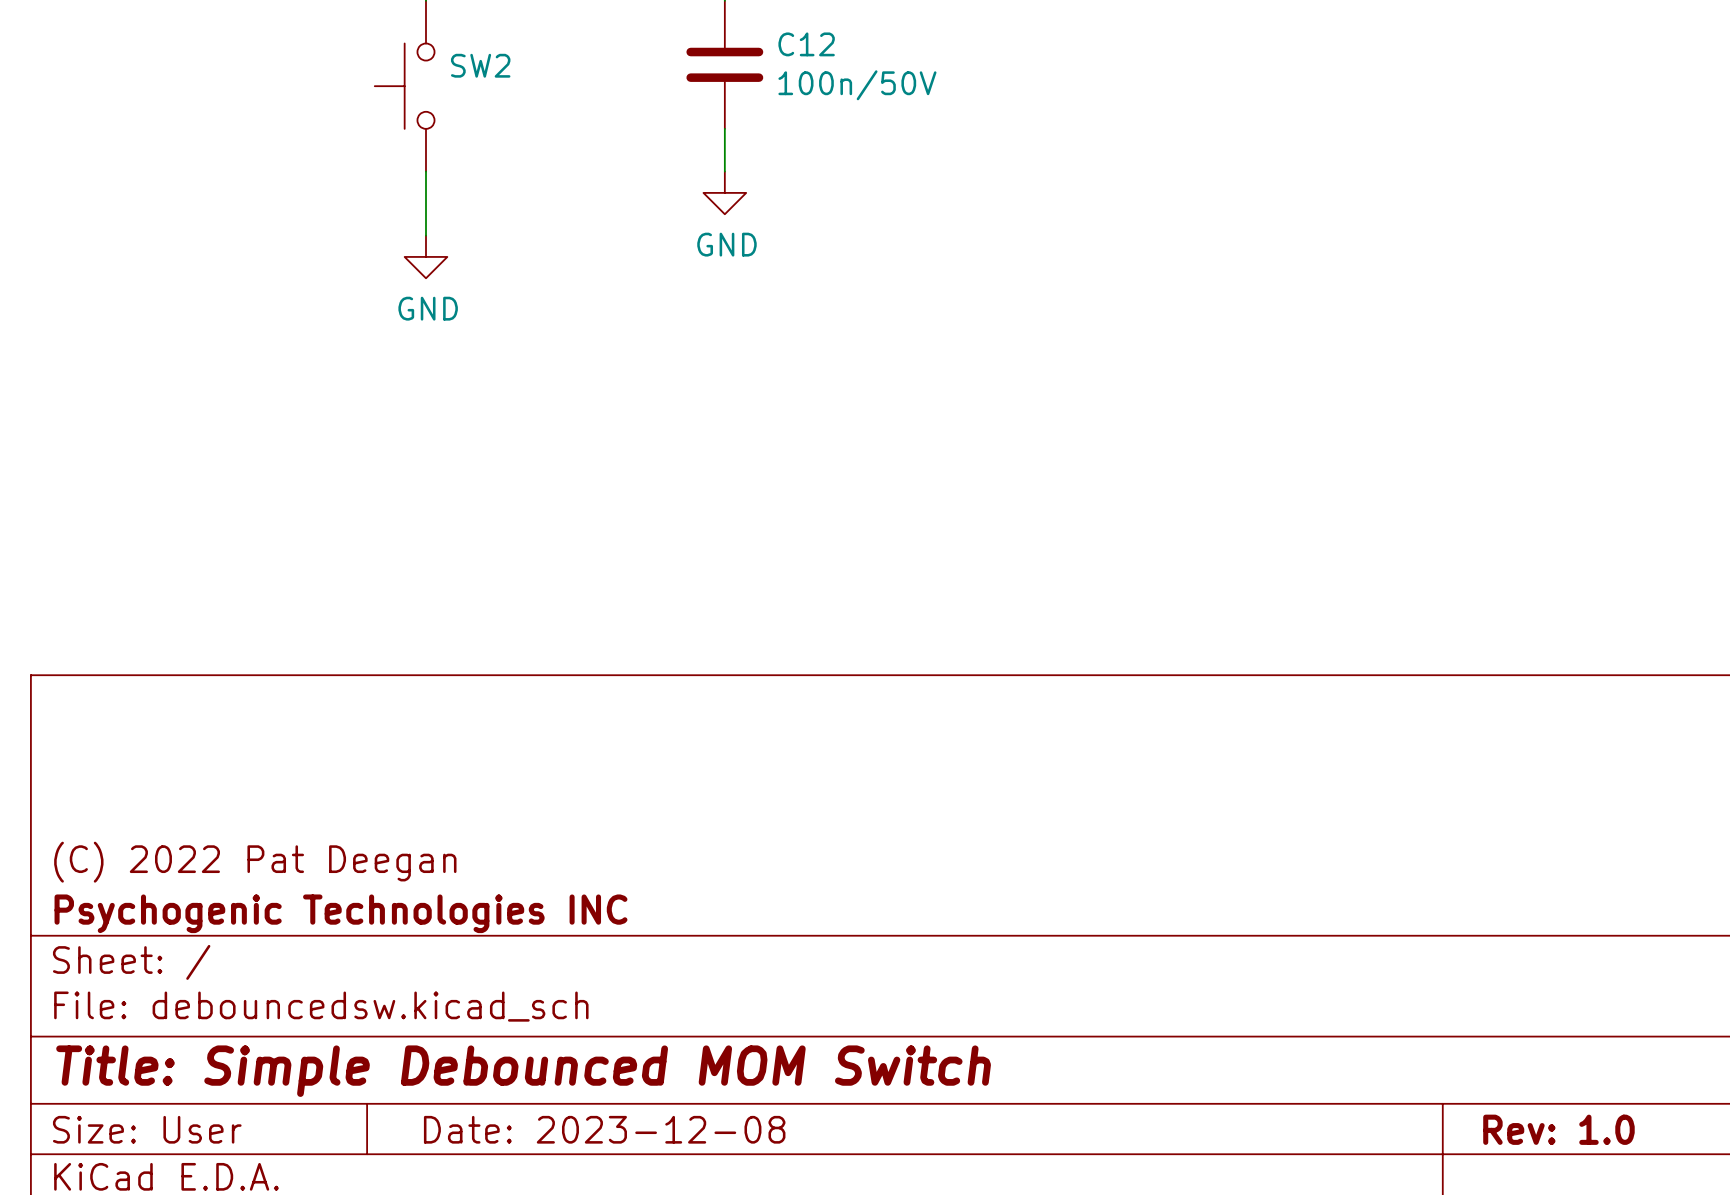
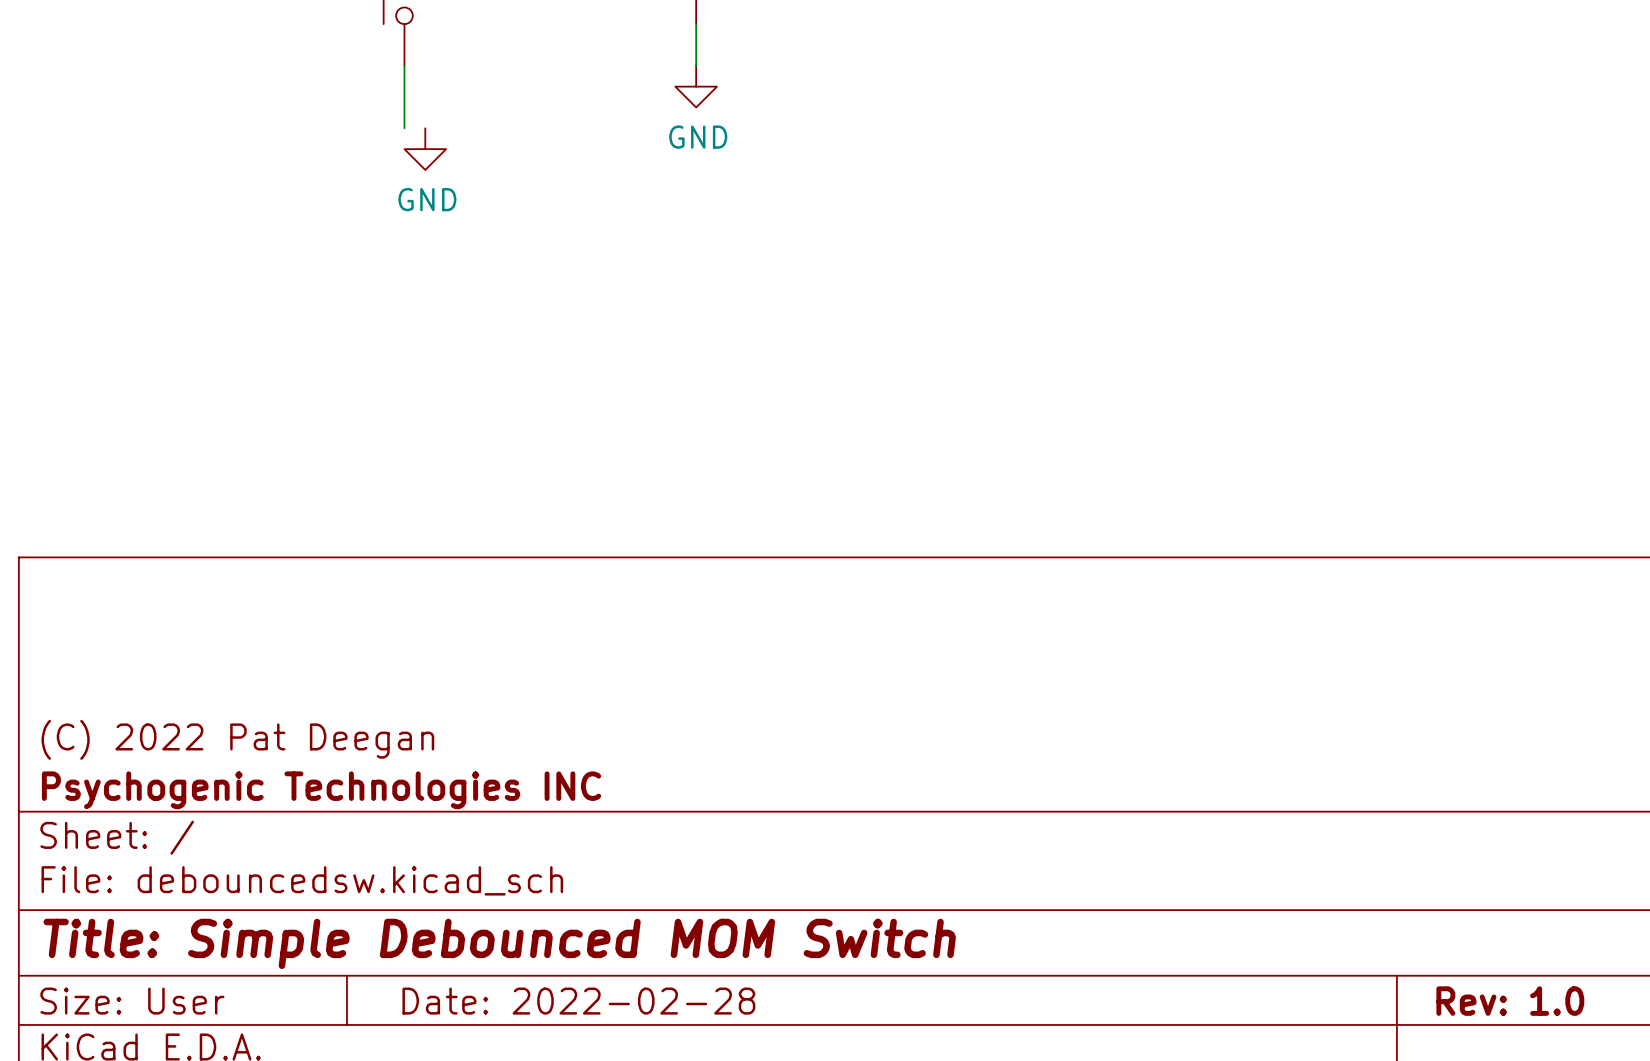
power symbol position: GND (426, 256) -> GND (425, 149)
title block: Date: 2023-12-08 (604, 1129) -> Date: 2022-02-28 (578, 1001)

